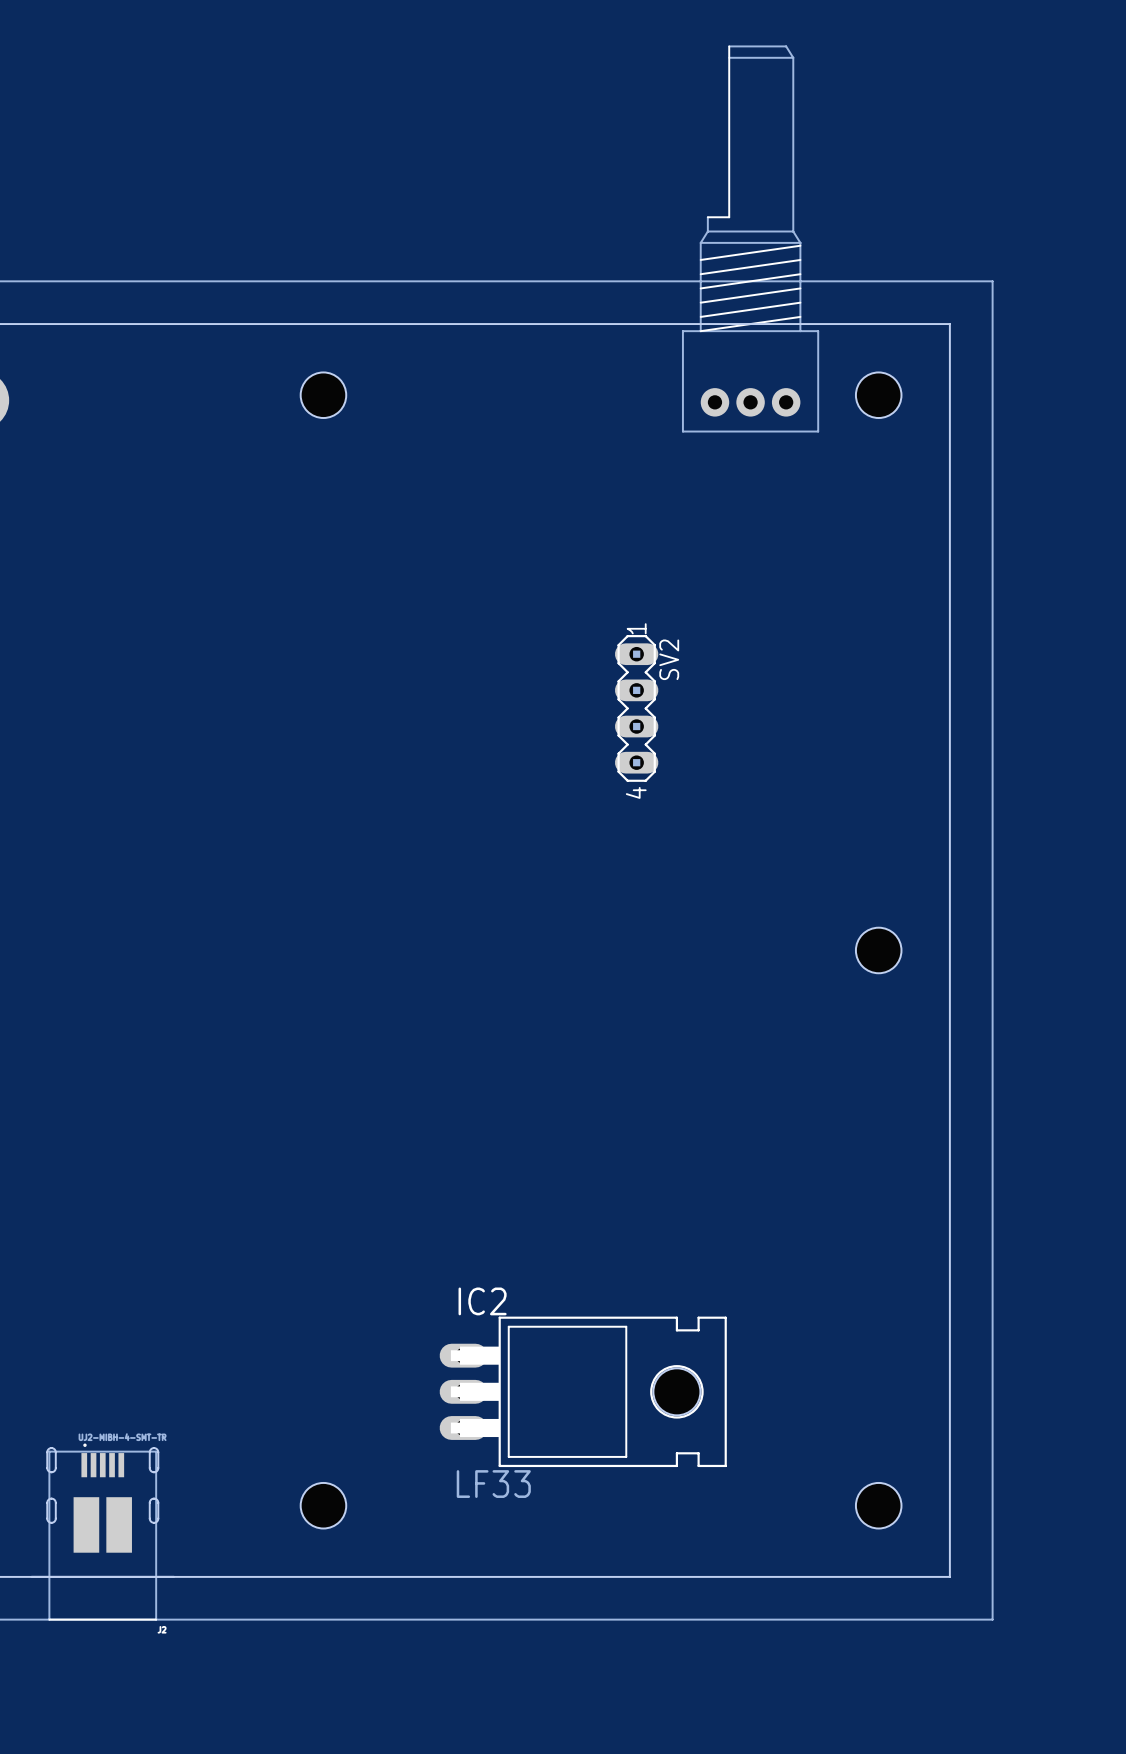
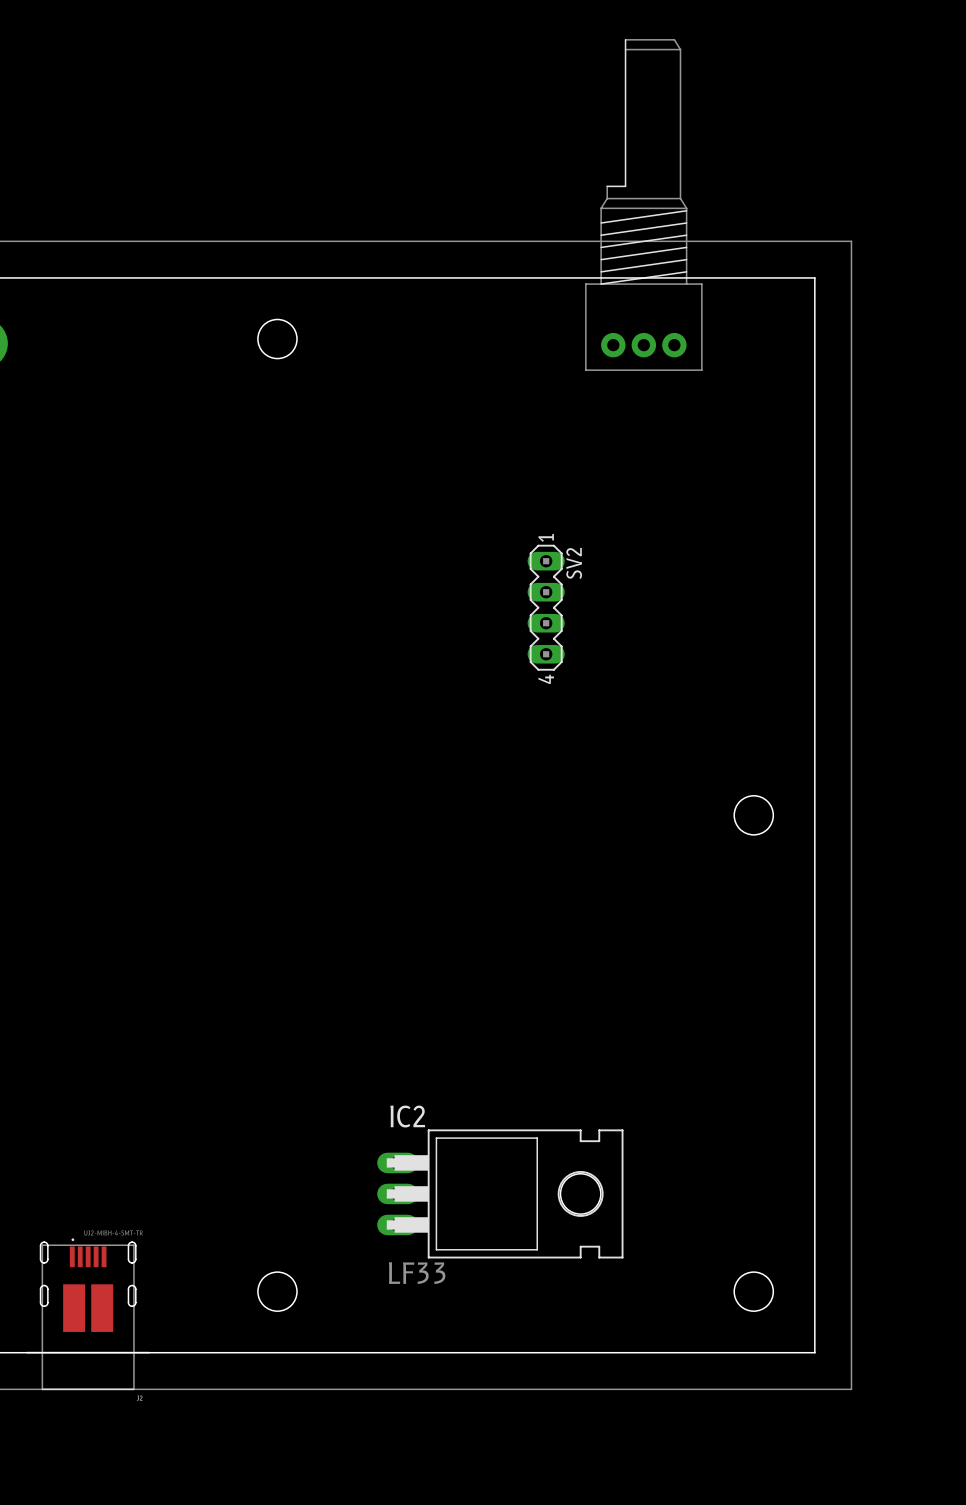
hole: (878, 395) -> none

